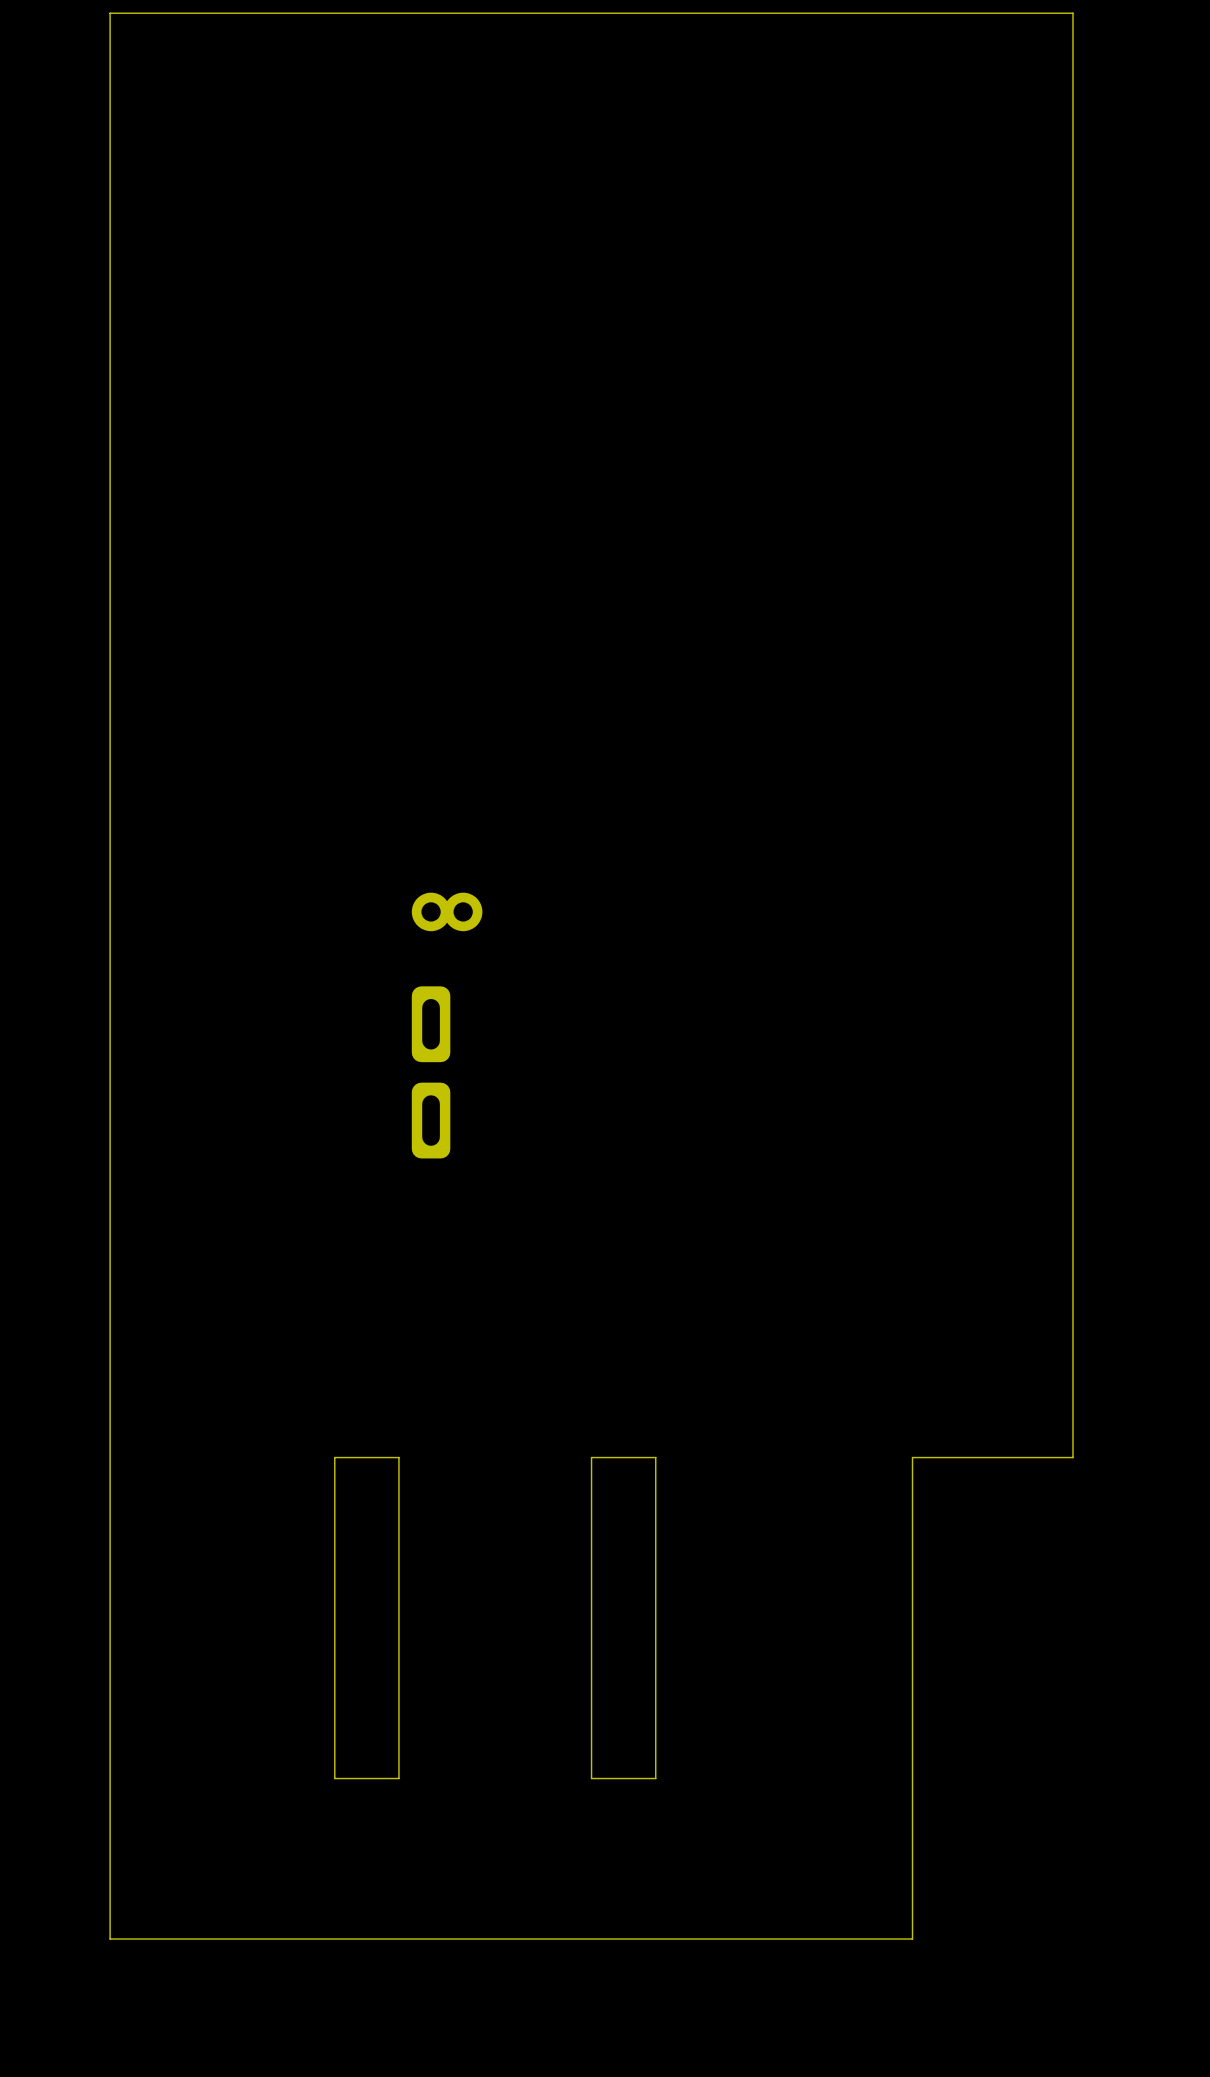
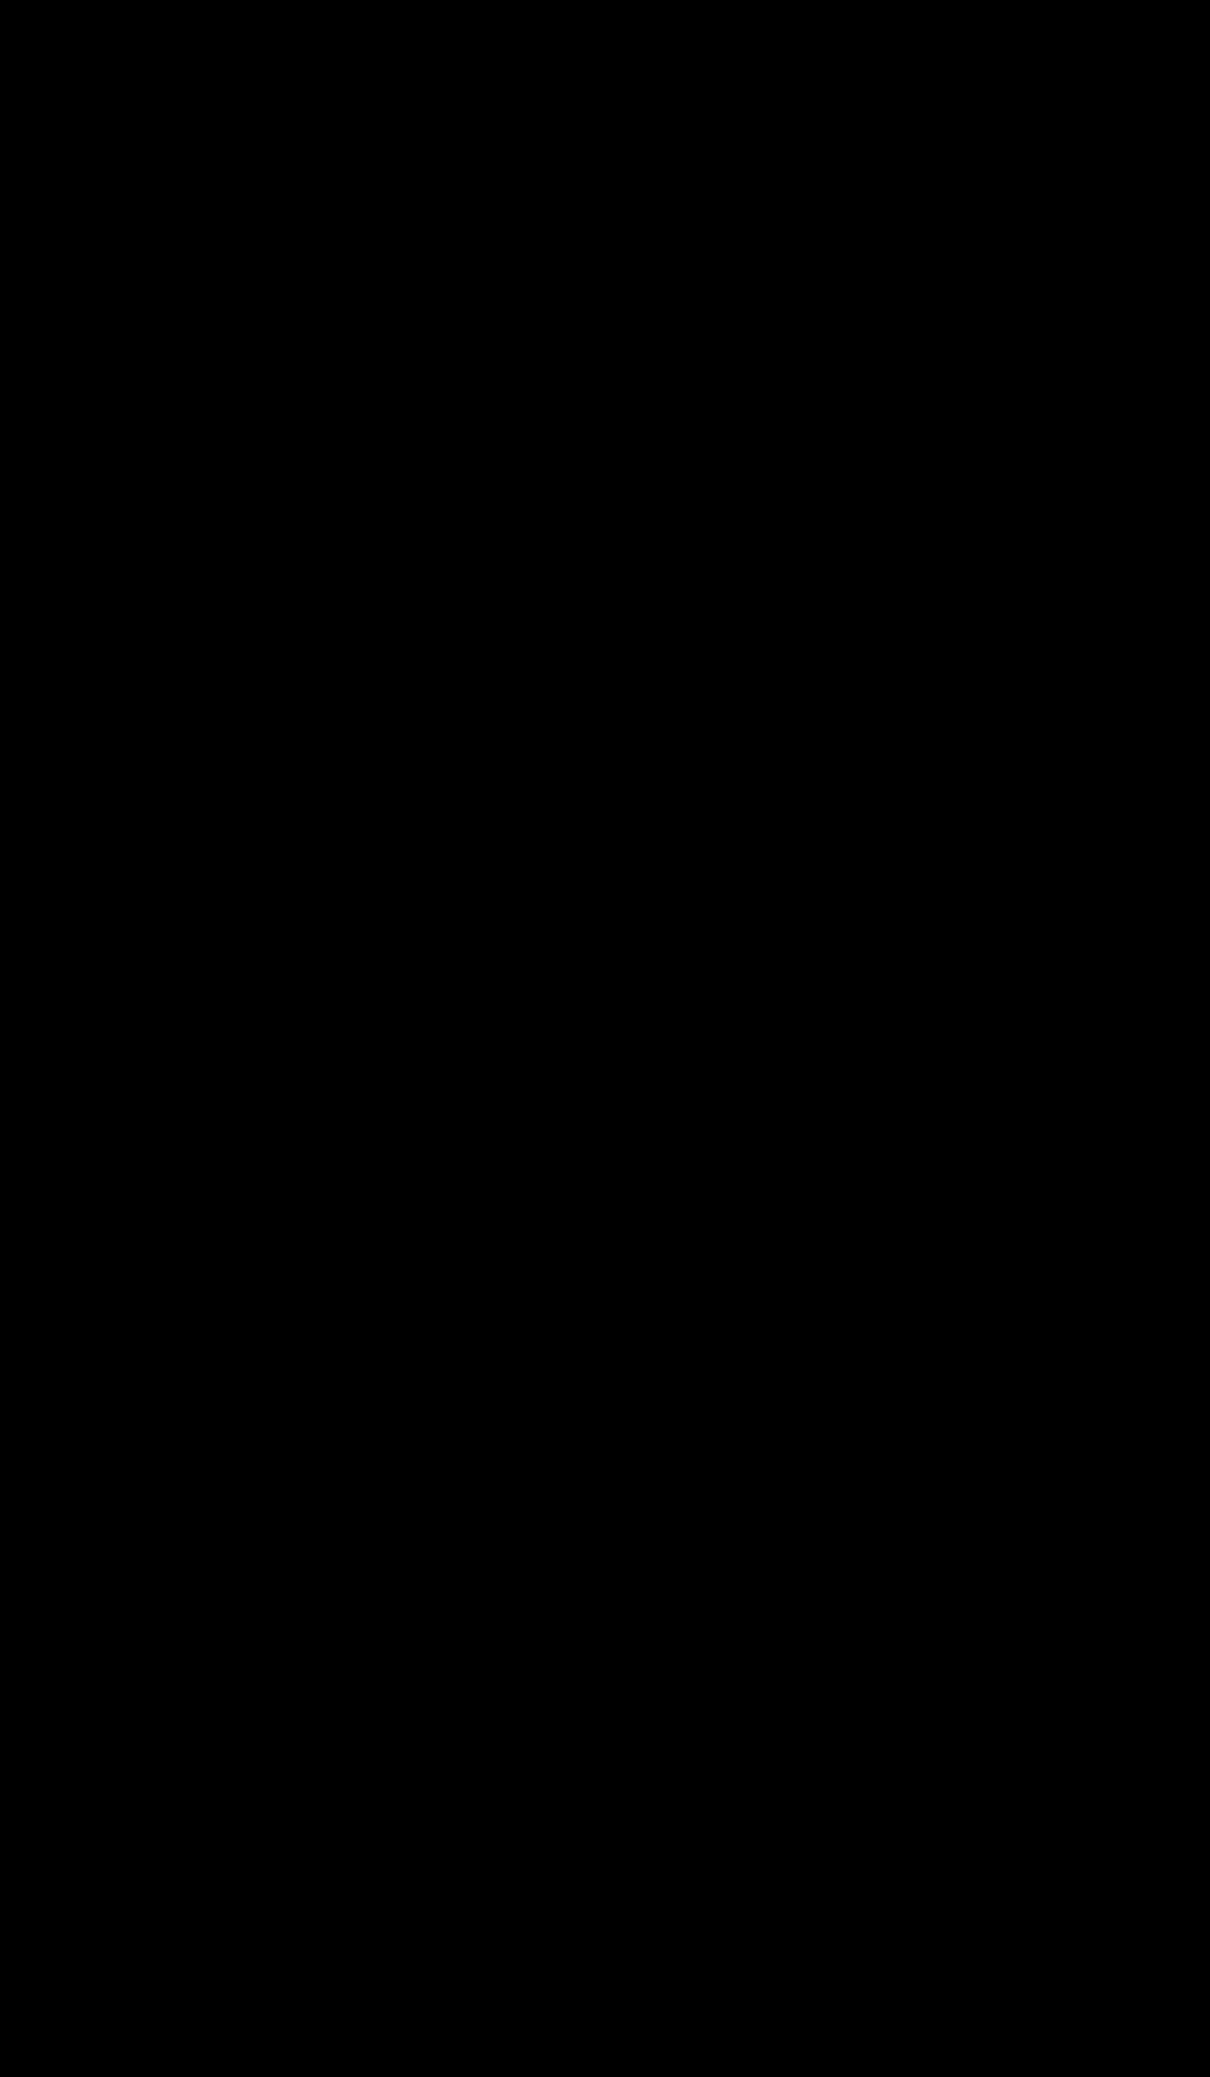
board edge: (1072, 13) (1072, 1457) (912, 1457) (912, 1939) (110, 1939) (110, 13) (1072, 13) -> none
part: (447, 1025) -> none
board edge: (398, 1457) (334, 1457) (334, 1778) (398, 1778) (398, 1457) -> none
board edge: (655, 1457) (591, 1457) (591, 1778) (655, 1778) (655, 1457) -> none

